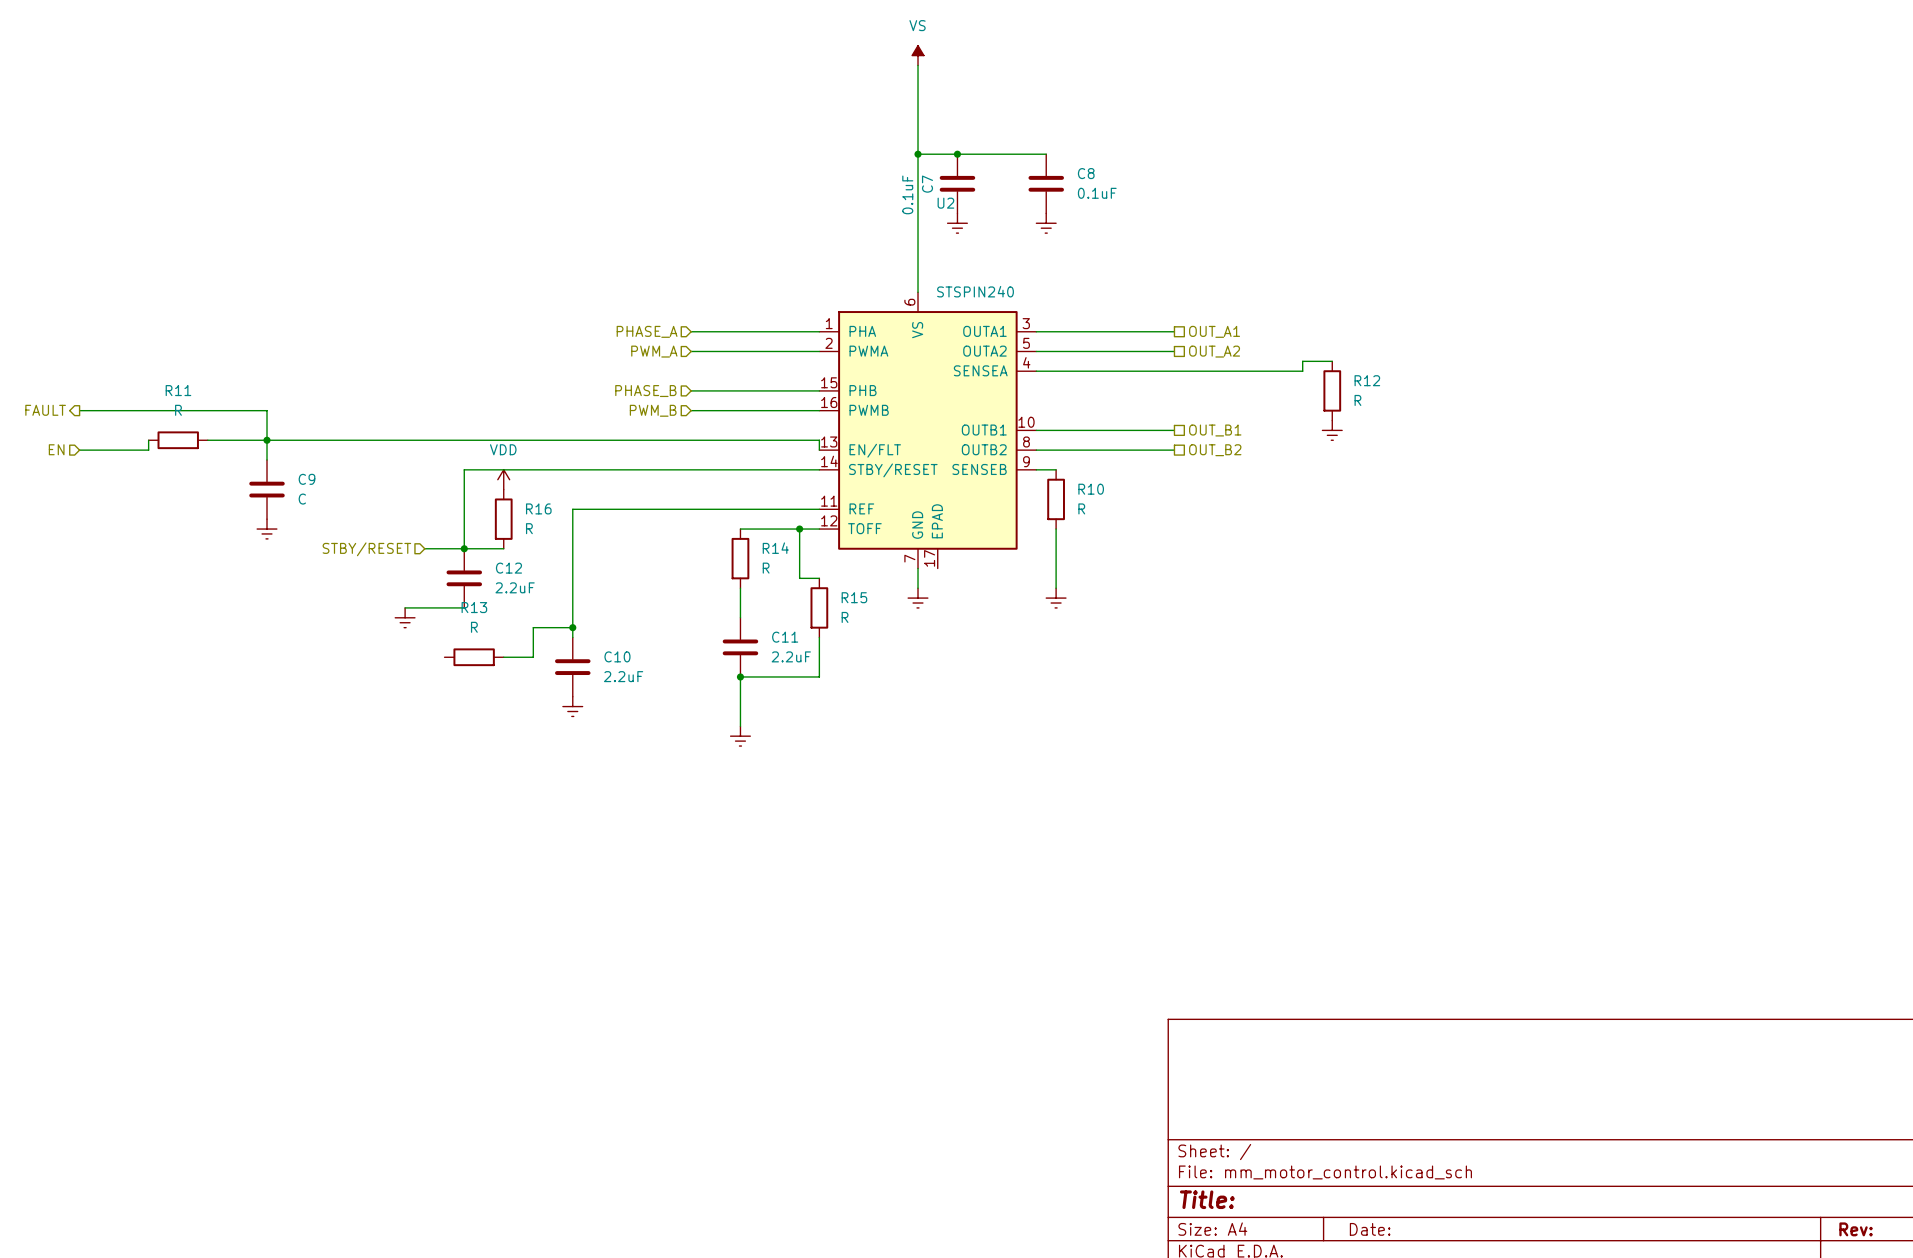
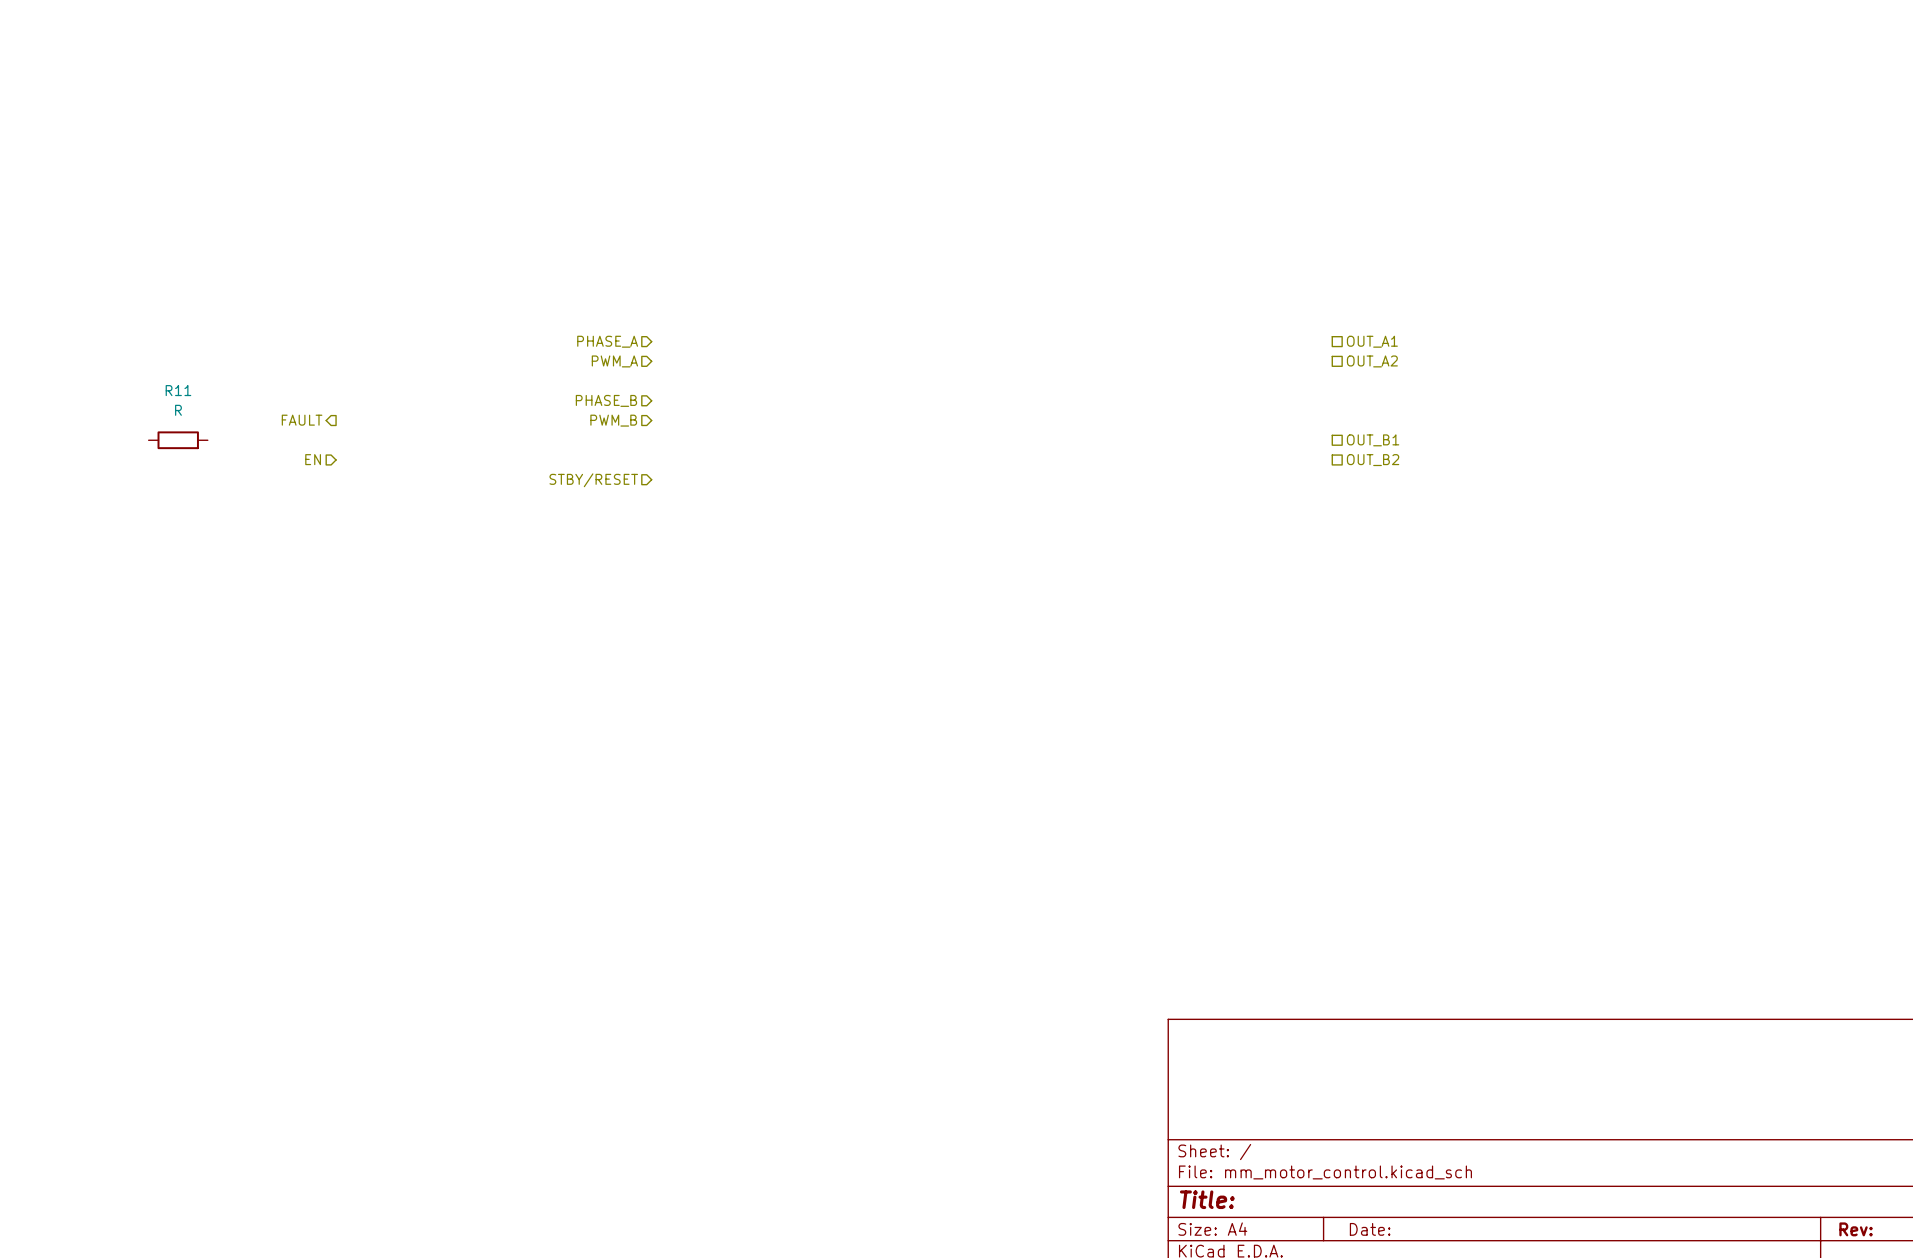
power symbol: VS (918, 55) -> none
wire: (918, 65) (918, 292) -> none
wire: (918, 154) (1046, 154) -> none
junction: (918, 154) -> none
junction: (957, 154) -> none
C7: 0.1uF (957, 183) -> none
C8: 0.1uF (1046, 183) -> none
power symbol: (957, 223) -> none
power symbol: (1046, 223) -> none
hierarchical label position: PHASE_A (647, 331) -> PHASE_A (607, 341)
wire: (691, 331) (819, 331) -> none
wire: (1036, 331) (1174, 331) -> none
hierarchical label position: OUT_A1 (1214, 331) -> OUT_A1 (1372, 341)
hierarchical label position: PWM_A (654, 351) -> PWM_A (614, 361)
wire: (691, 351) (819, 351) -> none
wire: (1036, 351) (1174, 351) -> none
hierarchical label position: OUT_A2 (1214, 351) -> OUT_A2 (1372, 361)
wire: (1332, 361) (1302, 361) (1302, 371) (1036, 371) -> none
wire: (691, 390) (819, 390) -> none
R12: R (1332, 390) -> none
hierarchical label position: PHASE_B (645, 391) -> PHASE_B (606, 400)
hierarchical label: FAULT (45, 410) -> none
wire: (79, 410) (267, 410) (267, 459) -> none
hierarchical label position: PWM_B (653, 410) -> PWM_B (613, 420)
wire: (691, 410) (819, 410) -> none
hierarchical label: none -> FAULT (302, 420)
U2: STSPIN240 (927, 430) -> none
wire: (1036, 430) (1174, 430) -> none
hierarchical label position: OUT_B1 (1215, 430) -> OUT_B1 (1373, 440)
power symbol: (1332, 430) -> none
wire: (148, 440) (148, 450) (79, 450) -> none
wire: (207, 440) (819, 440) (819, 450) -> none
junction: (267, 440) -> none
hierarchical label: EN (56, 449) -> none
wire: (1036, 450) (1174, 450) -> none
hierarchical label position: OUT_B2 (1215, 450) -> OUT_B2 (1373, 460)
hierarchical label: none -> EN (313, 459)
wire: (819, 469) (464, 469) (464, 548) -> none
wire: (1036, 469) (1056, 469) -> none
power symbol: VDD (503, 479) -> none
hierarchical label: none -> STBY/RESET (593, 480)
C9: C (267, 489) -> none
R10: R (1056, 499) -> none
wire: (819, 509) (572, 509) (572, 637) -> none
R16: R (503, 519) -> none
power symbol: (267, 529) -> none
wire: (740, 529) (819, 529) -> none
wire: (799, 529) (799, 578) (819, 578) -> none
junction: (799, 529) -> none
wire: (1056, 529) (1056, 588) -> none
wire: (424, 548) (503, 548) -> none
junction: (464, 548) -> none
hierarchical label: STBY/RESET (366, 549) -> none
R14: R (740, 558) -> none
wire: (918, 568) (918, 588) -> none
C12: 2.2uF (464, 578) -> none
wire: (740, 588) (740, 617) -> none
power symbol: (918, 598) -> none
power symbol: (1056, 598) -> none
wire: (405, 607) (464, 607) -> none
R15: R (819, 607) -> none
power symbol: (405, 617) -> none
wire: (572, 627) (533, 627) (533, 657) (503, 657) -> none
junction: (572, 627) -> none
wire: (819, 637) (819, 676) (740, 676) (740, 726) -> none
C11: 2.2uF (740, 647) -> none
R13: R (474, 657) -> none
C10: 2.2uF (572, 667) -> none
junction: (740, 676) -> none
power symbol: (572, 706) -> none
power symbol: (740, 736) -> none

